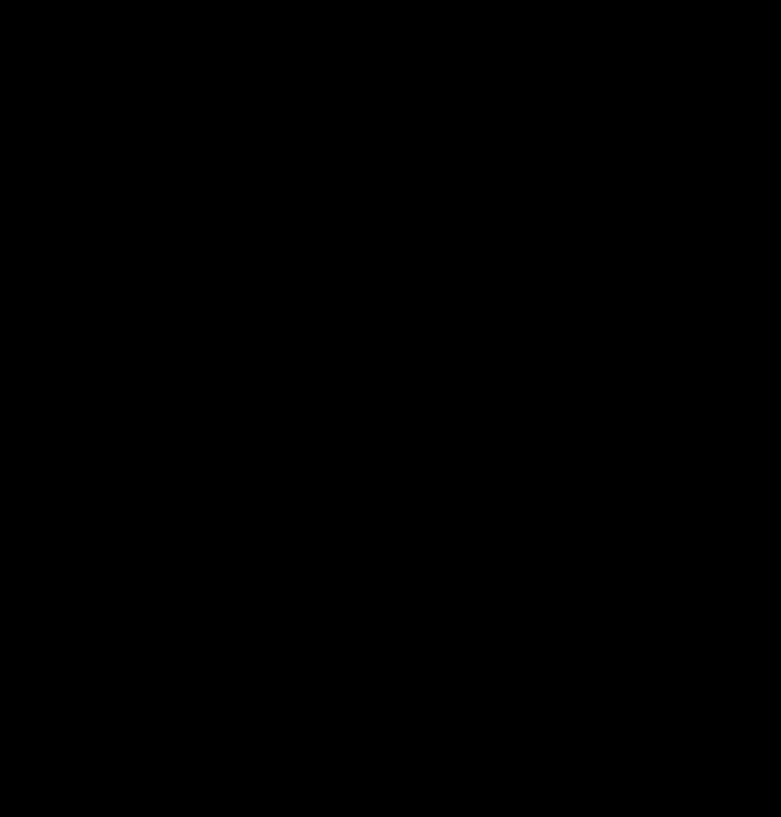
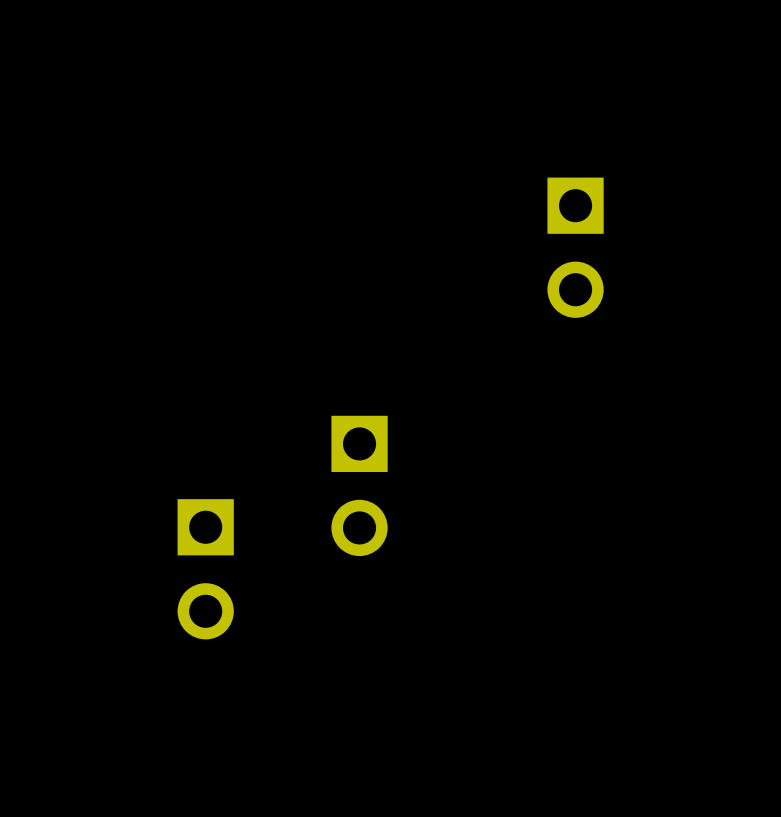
part: none -> (575, 247)
part: none -> (359, 485)
part: none -> (205, 569)

